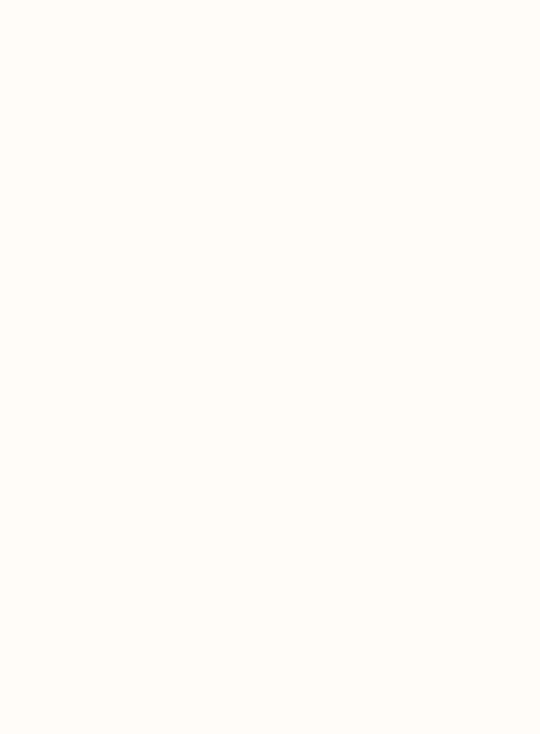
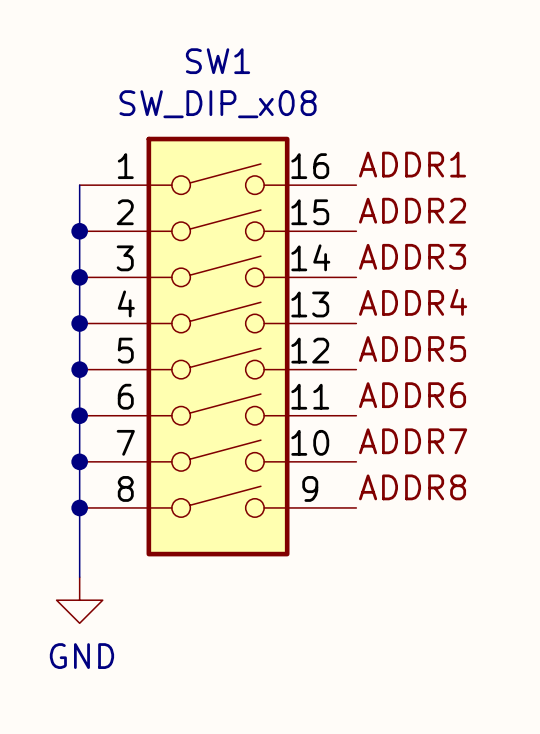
label: none -> ADDR1 (412, 164)
wire: none -> (79, 185) (79, 577)
label: none -> ADDR2 (412, 210)
junction: none -> (79, 231)
label: none -> ADDR3 (412, 256)
junction: none -> (79, 277)
label: none -> ADDR4 (413, 302)
junction: none -> (79, 323)
SW1: none -> SW_DIP_x08 (218, 346)
label: none -> ADDR5 (412, 349)
junction: none -> (79, 369)
label: none -> ADDR6 (412, 395)
junction: none -> (79, 415)
label: none -> ADDR7 (413, 441)
junction: none -> (79, 461)
label: none -> ADDR8 (412, 487)
junction: none -> (79, 507)
power symbol: none -> GND (79, 600)

